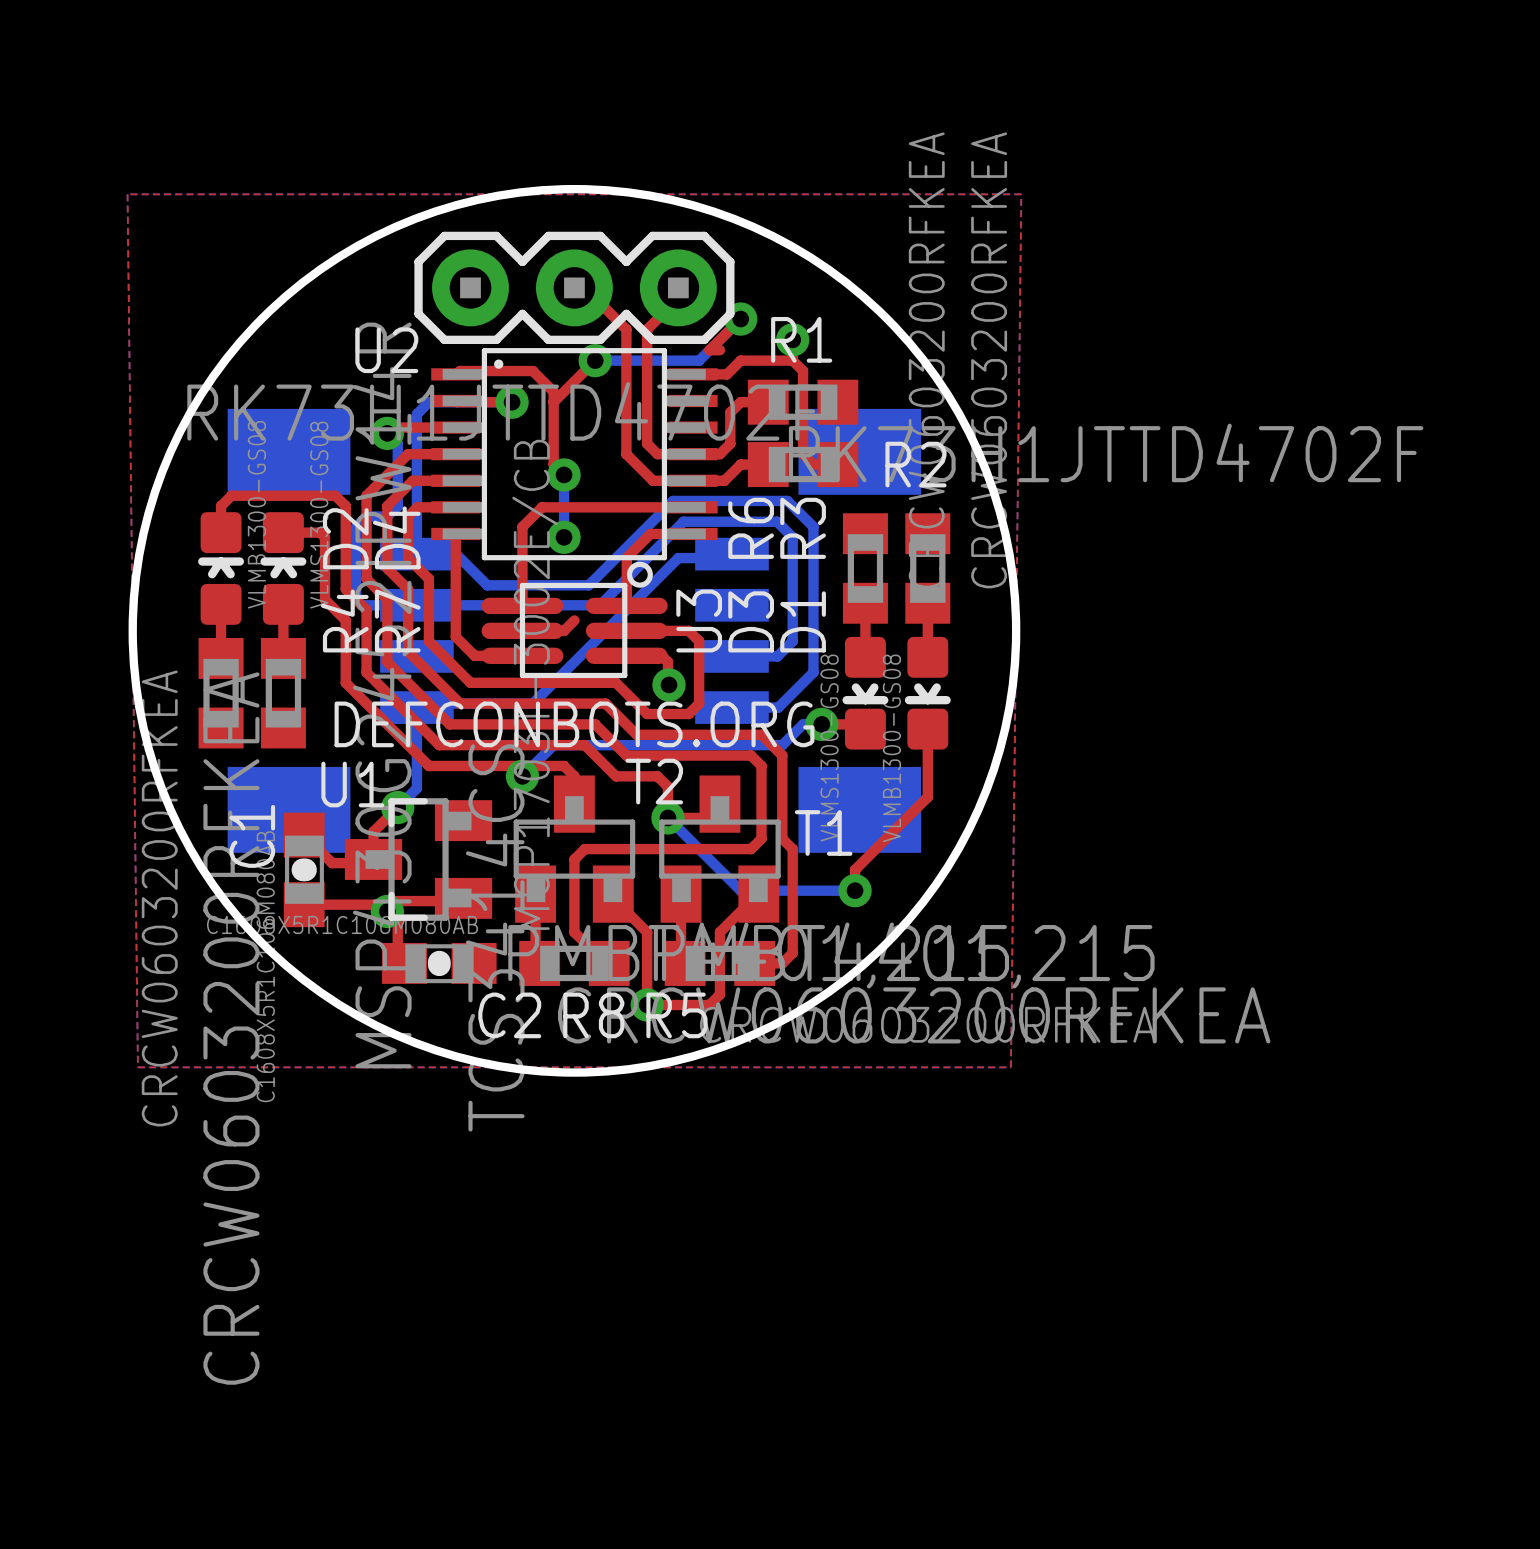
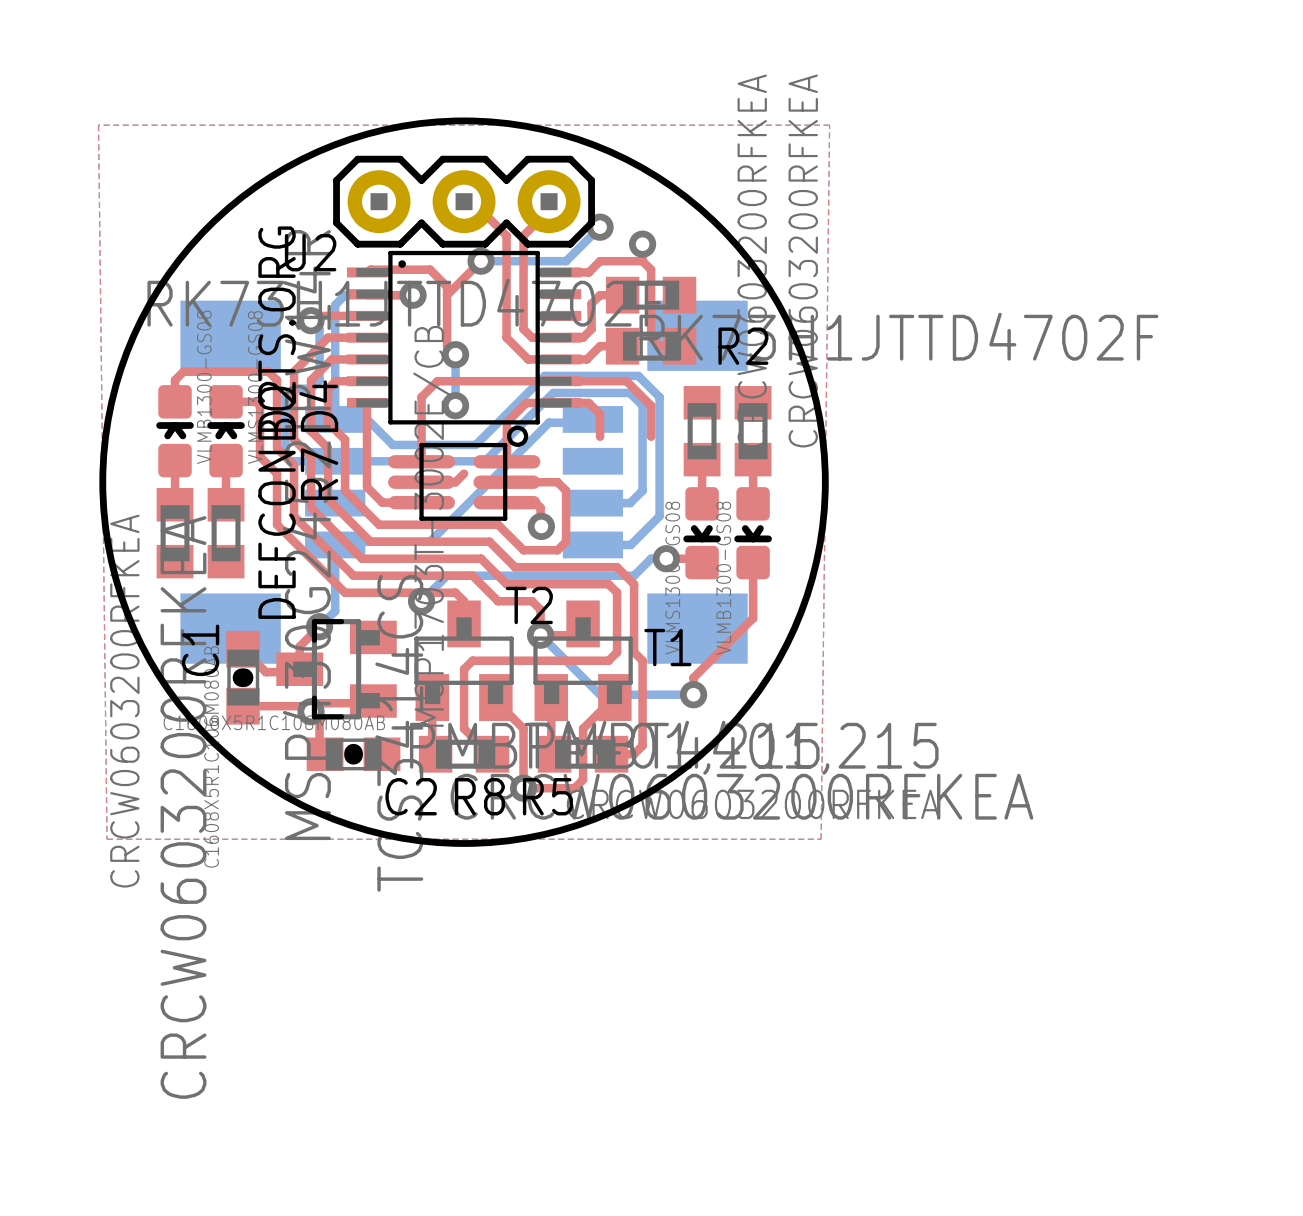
top track: (740, 319) (709, 350) (719, 350) -> none
R1 name: R1 (801, 339) -> none
top track: none -> (561, 381) (626, 381) (651, 405) (651, 436)
R6 name: R6 (751, 528) -> none
R3 name: R3 (803, 528) -> none
top track: none -> (561, 402) (588, 402) (600, 414) (600, 436)
R4 name: R4 (344, 620) -> none
U3 name: U3 (699, 620) -> none
D3 name: D3 (751, 621) -> none
D1 name: D1 (803, 621) -> none
text rotation: 0° (574, 724) -> 90° counterclockwise (277, 422)
U1 name: U1 (352, 784) -> none

